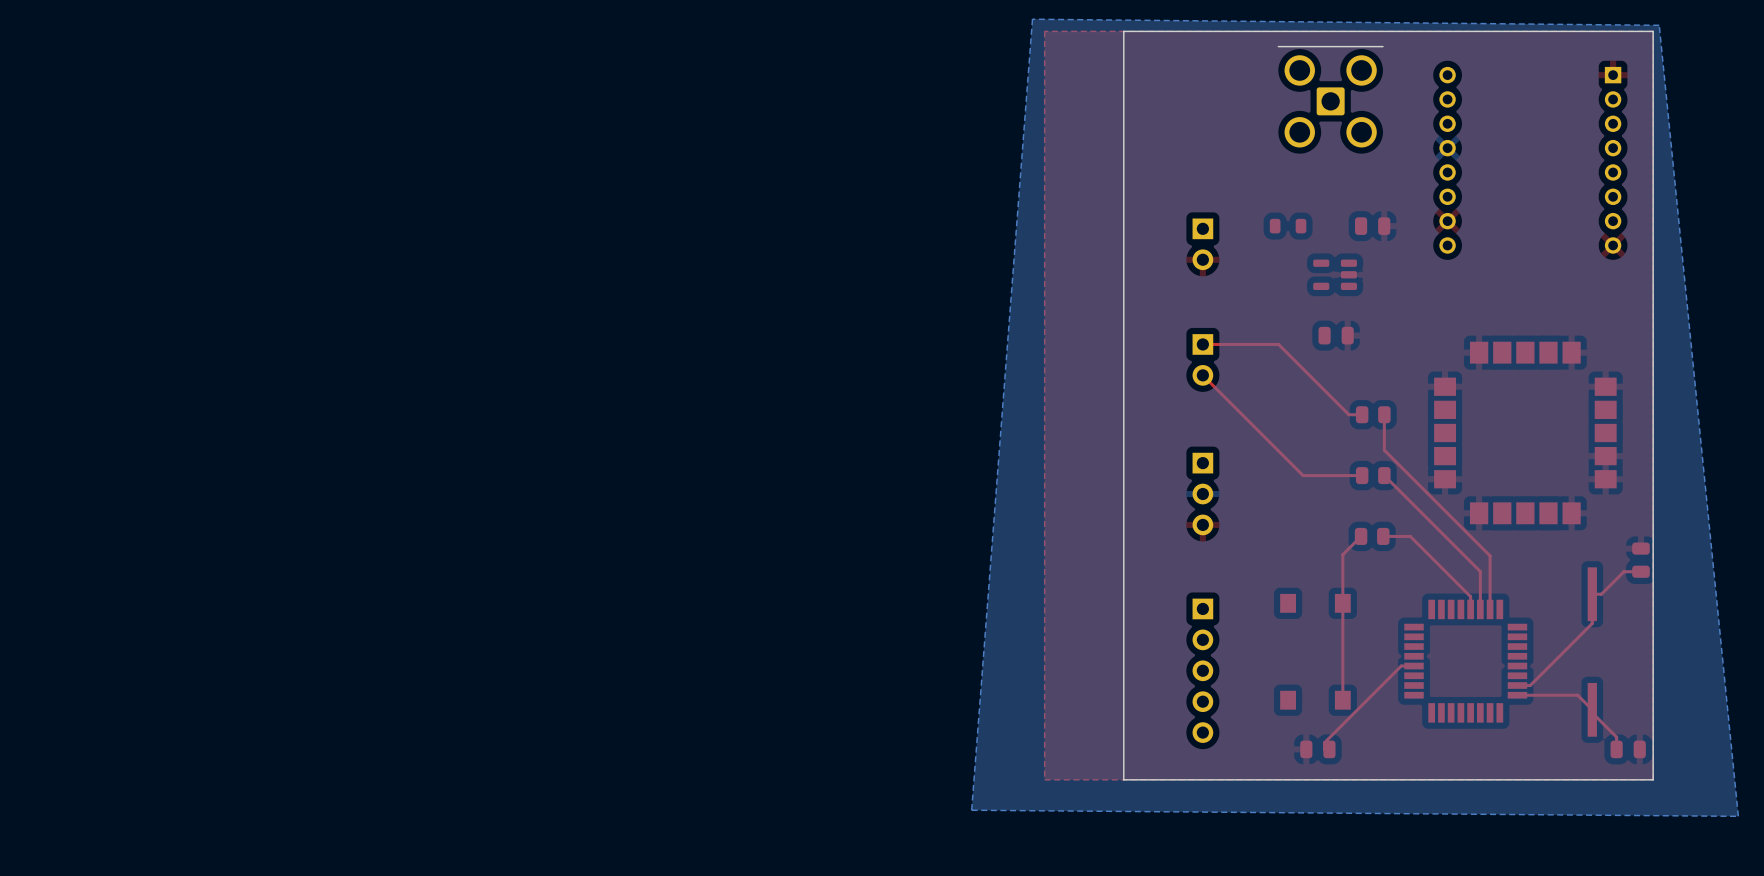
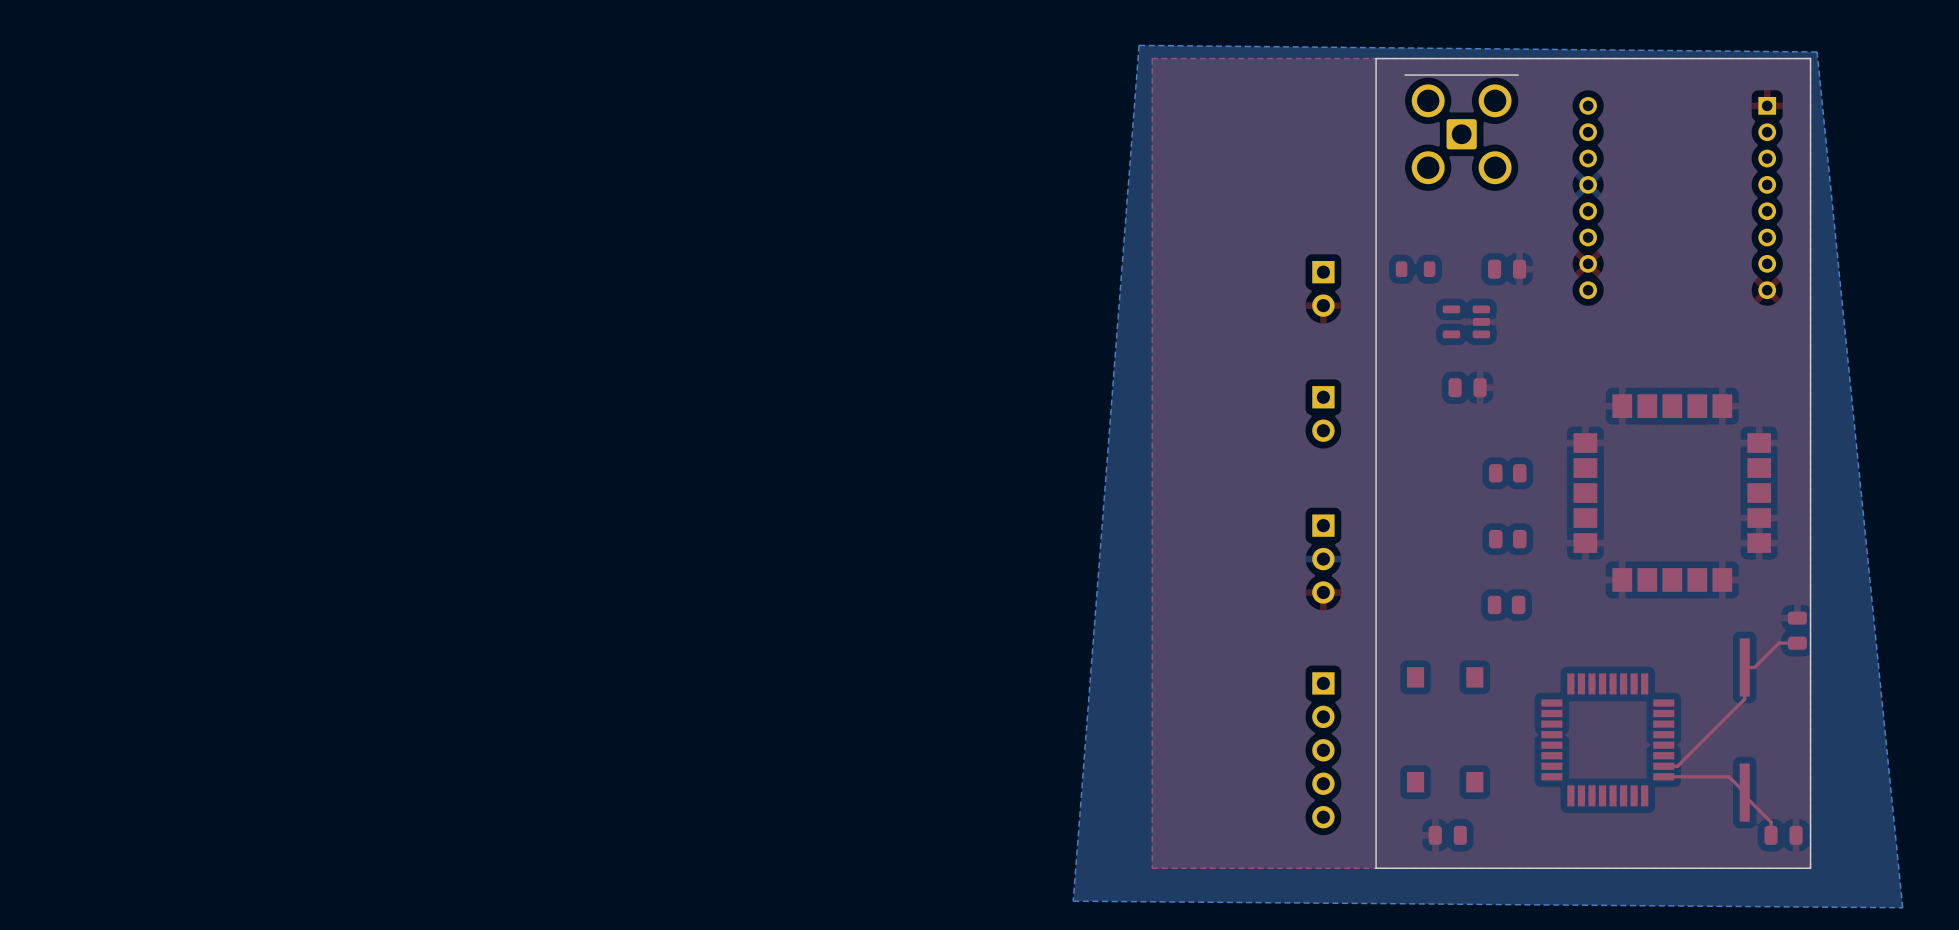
board edge: (1251, 31) (1123, 31) (1123, 779) (1251, 779) -> (1376, 58) (1376, 868)
top track: (1202, 344) (1278, 344) (1348, 414) (1362, 414) -> none
top track: (1202, 375) (1303, 475) (1362, 475) -> none
top track: (1384, 414) (1384, 450) (1490, 555) (1490, 609) -> none
top track: (1384, 475) (1480, 571) (1480, 609) -> none
top track: (1361, 536) (1342, 554) (1342, 700) -> none
top track: (1383, 536) (1410, 536) (1470, 596) (1470, 609) -> none
top track: (1414, 666) (1401, 666) (1324, 742) (1324, 749) (1329, 749) -> none

